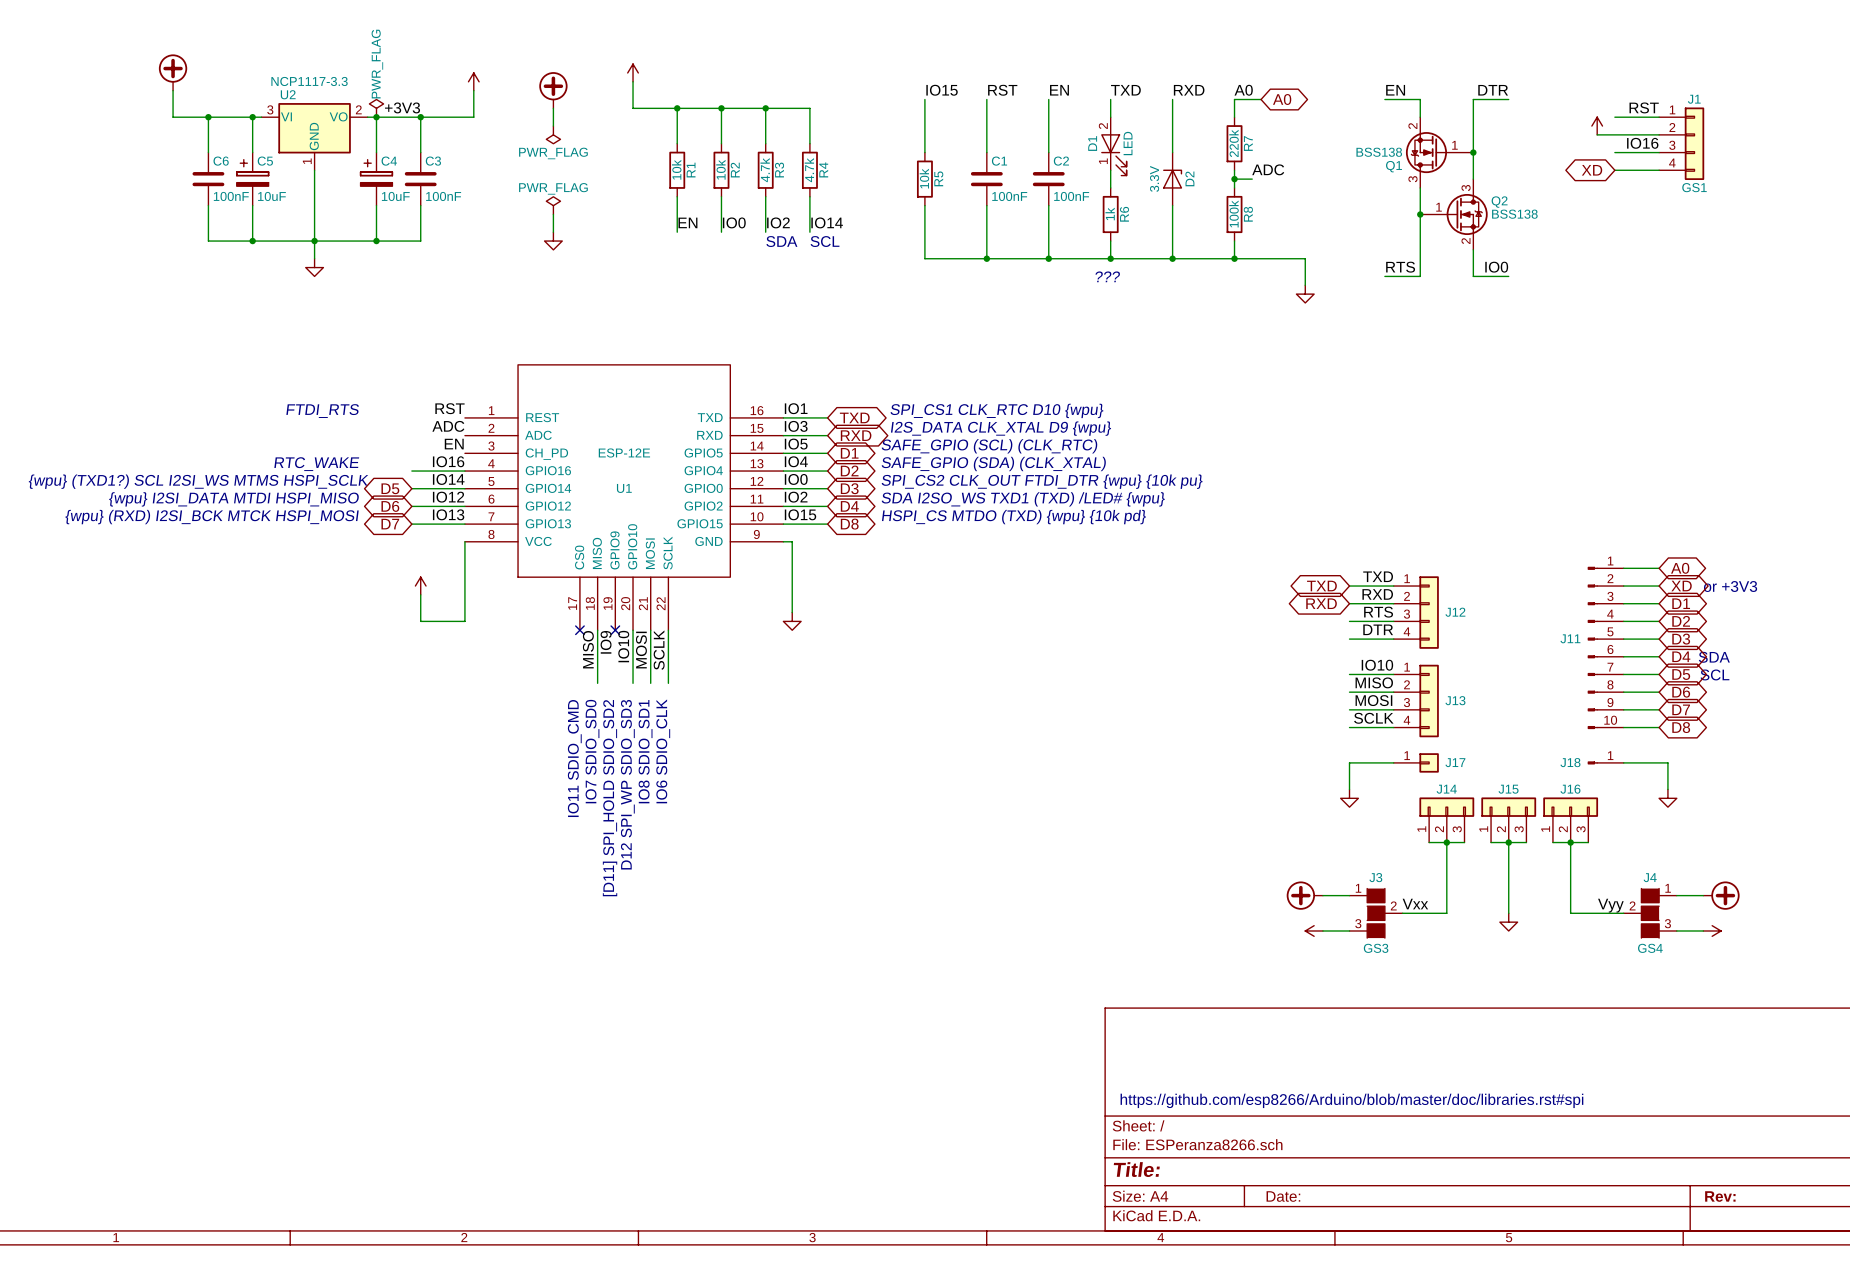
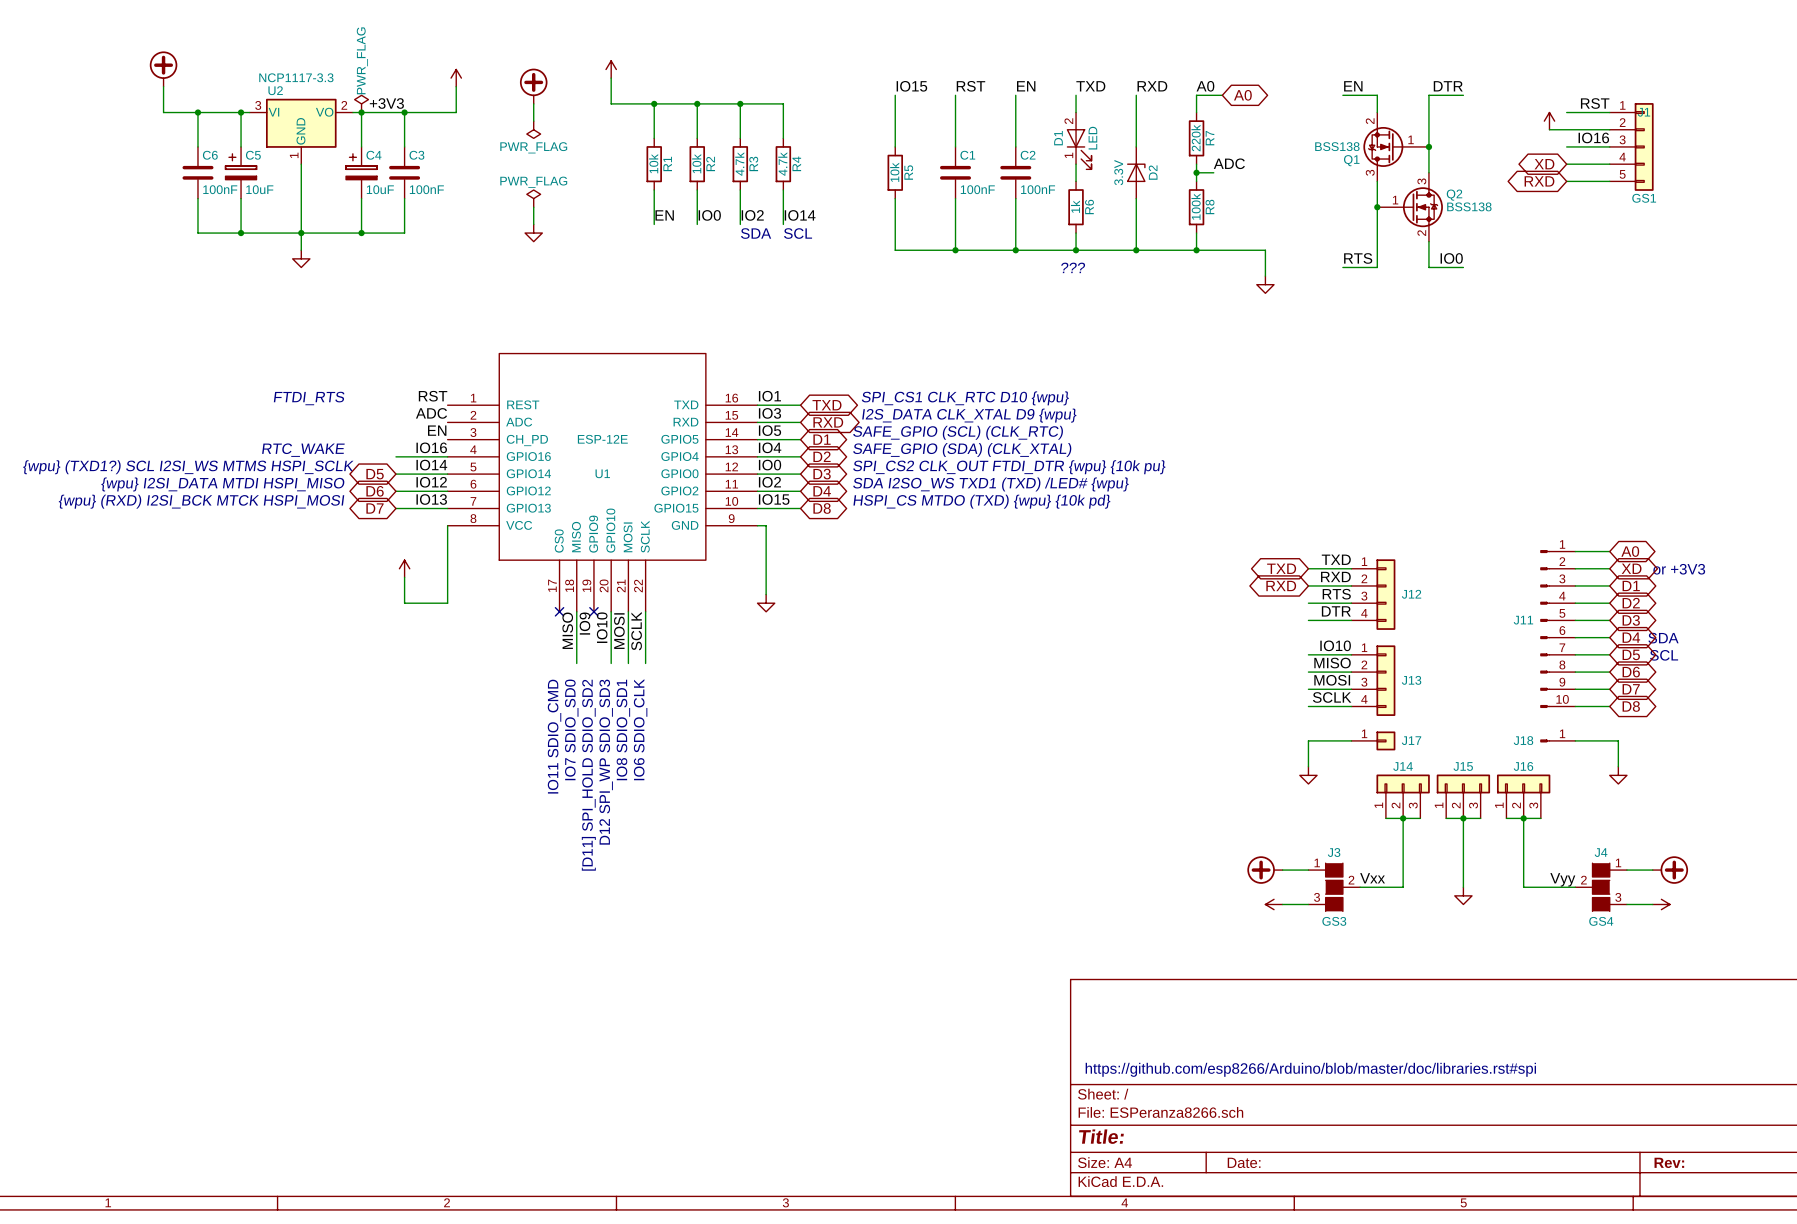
J1 symbol: [1659, 107, 1705, 181] -> [1609, 103, 1654, 191]
global label: none -> RXD (1539, 181)
wire: none -> (1566, 181) (1609, 181)

